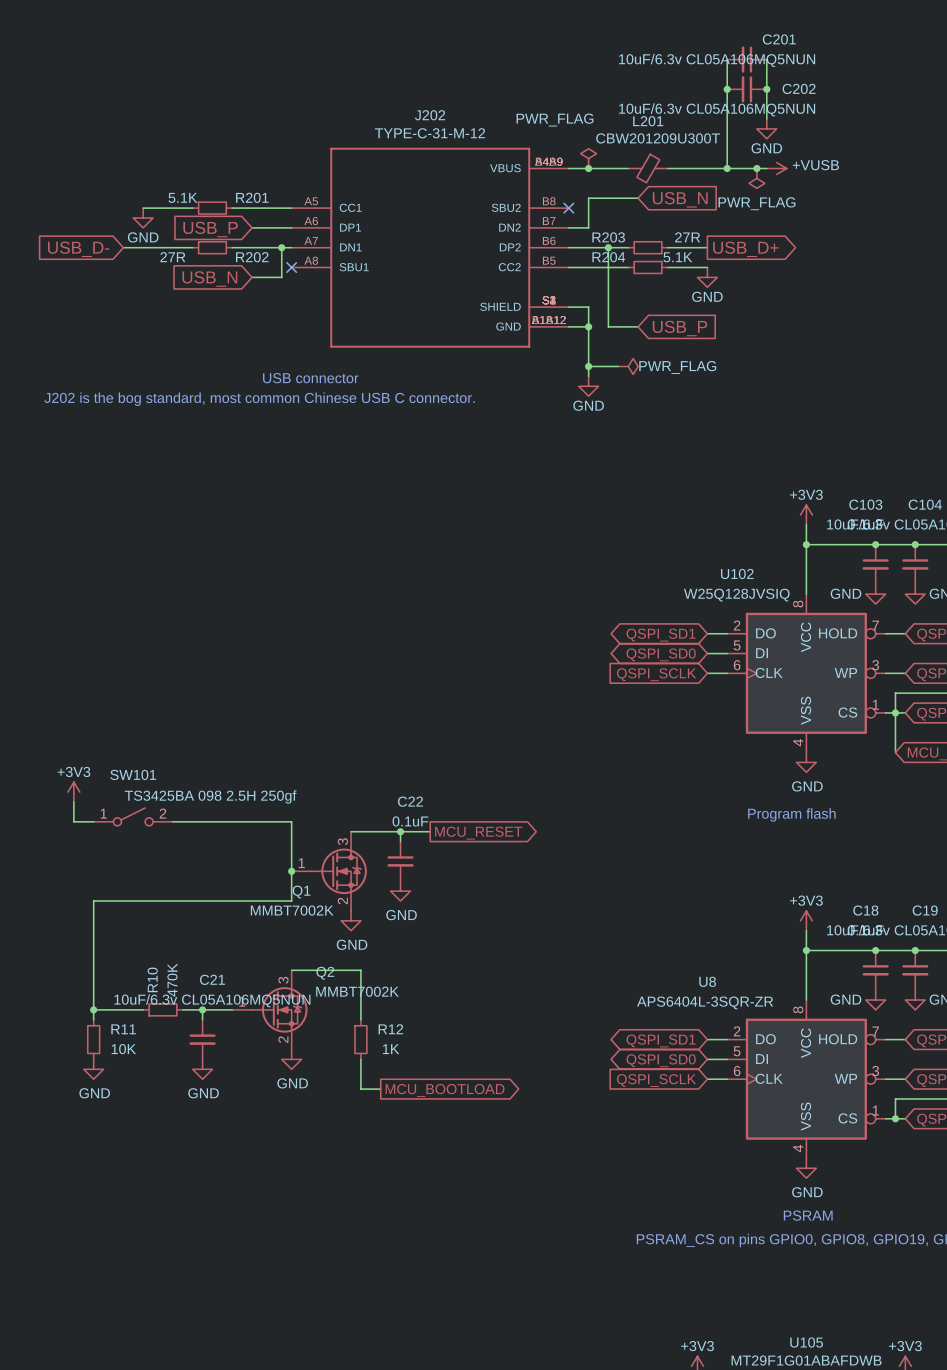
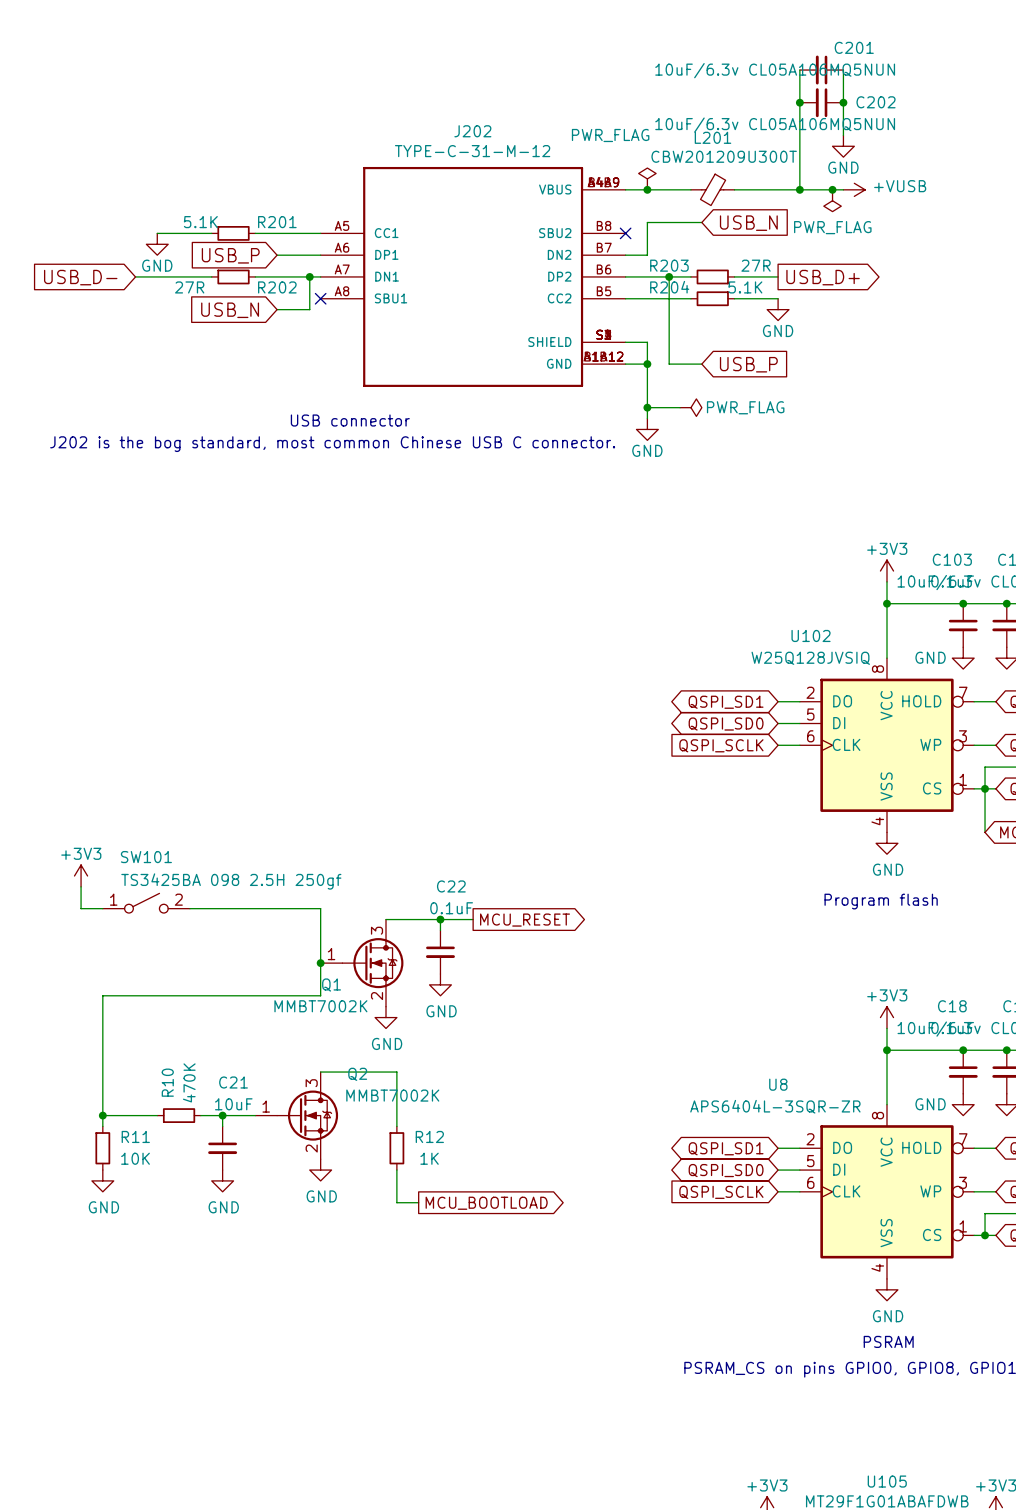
C21 value: 10uF/6.3v CL05A106MQ5NUN (212, 1000) -> 10uF (233, 1104)

